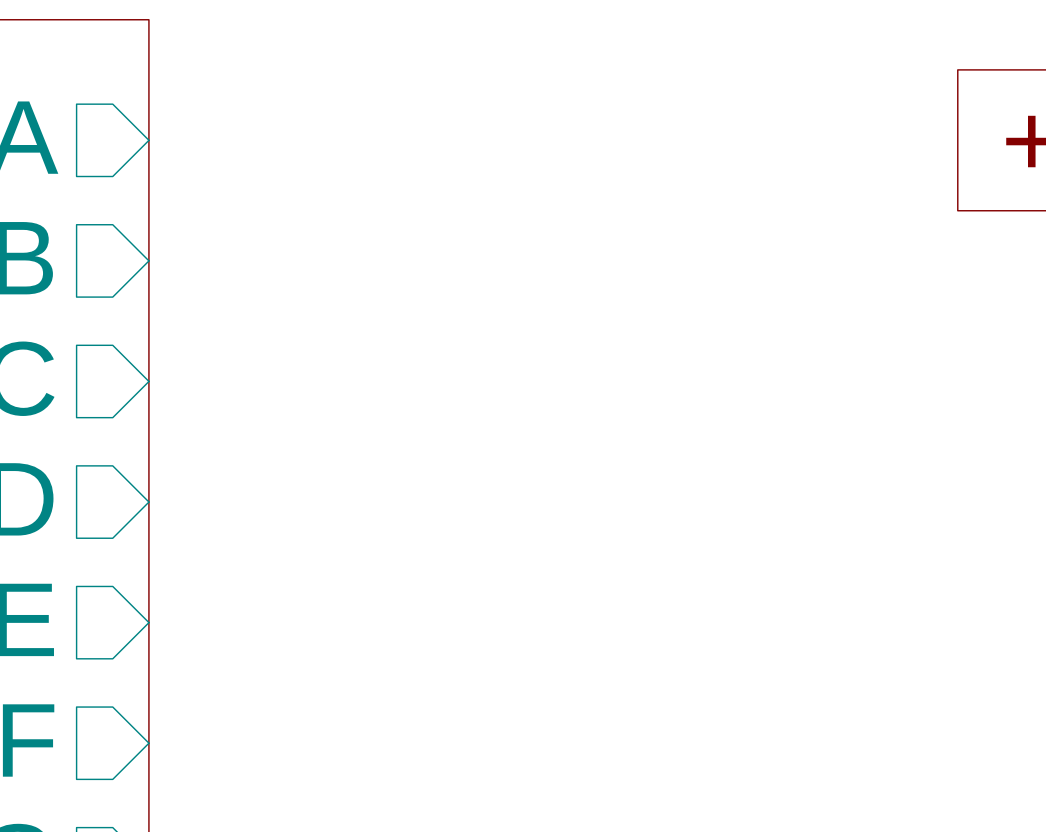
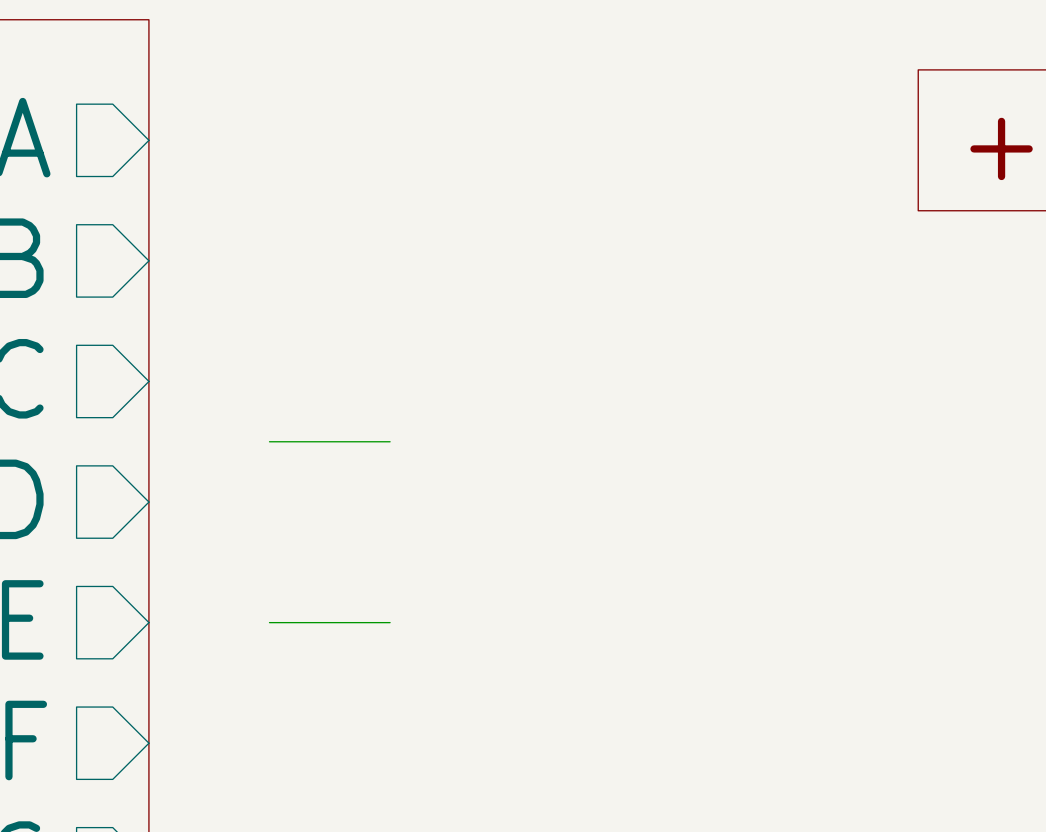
wire: none -> (269, 441) (390, 441)
wire: none -> (269, 622) (390, 622)

